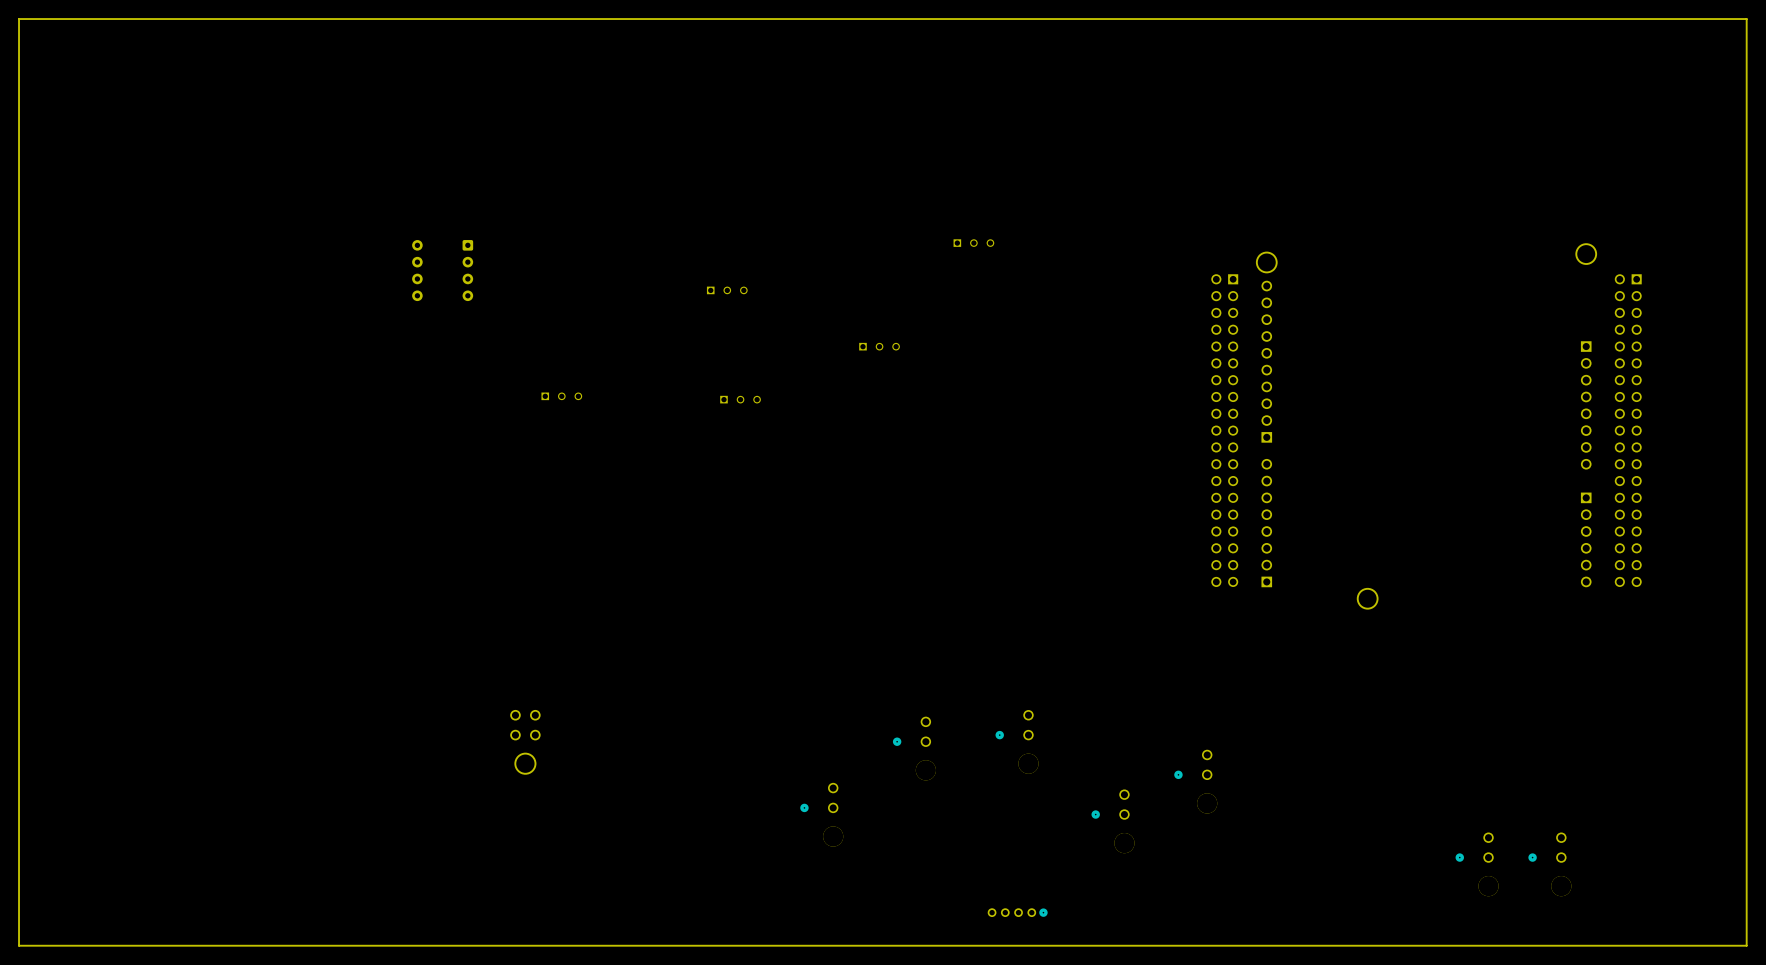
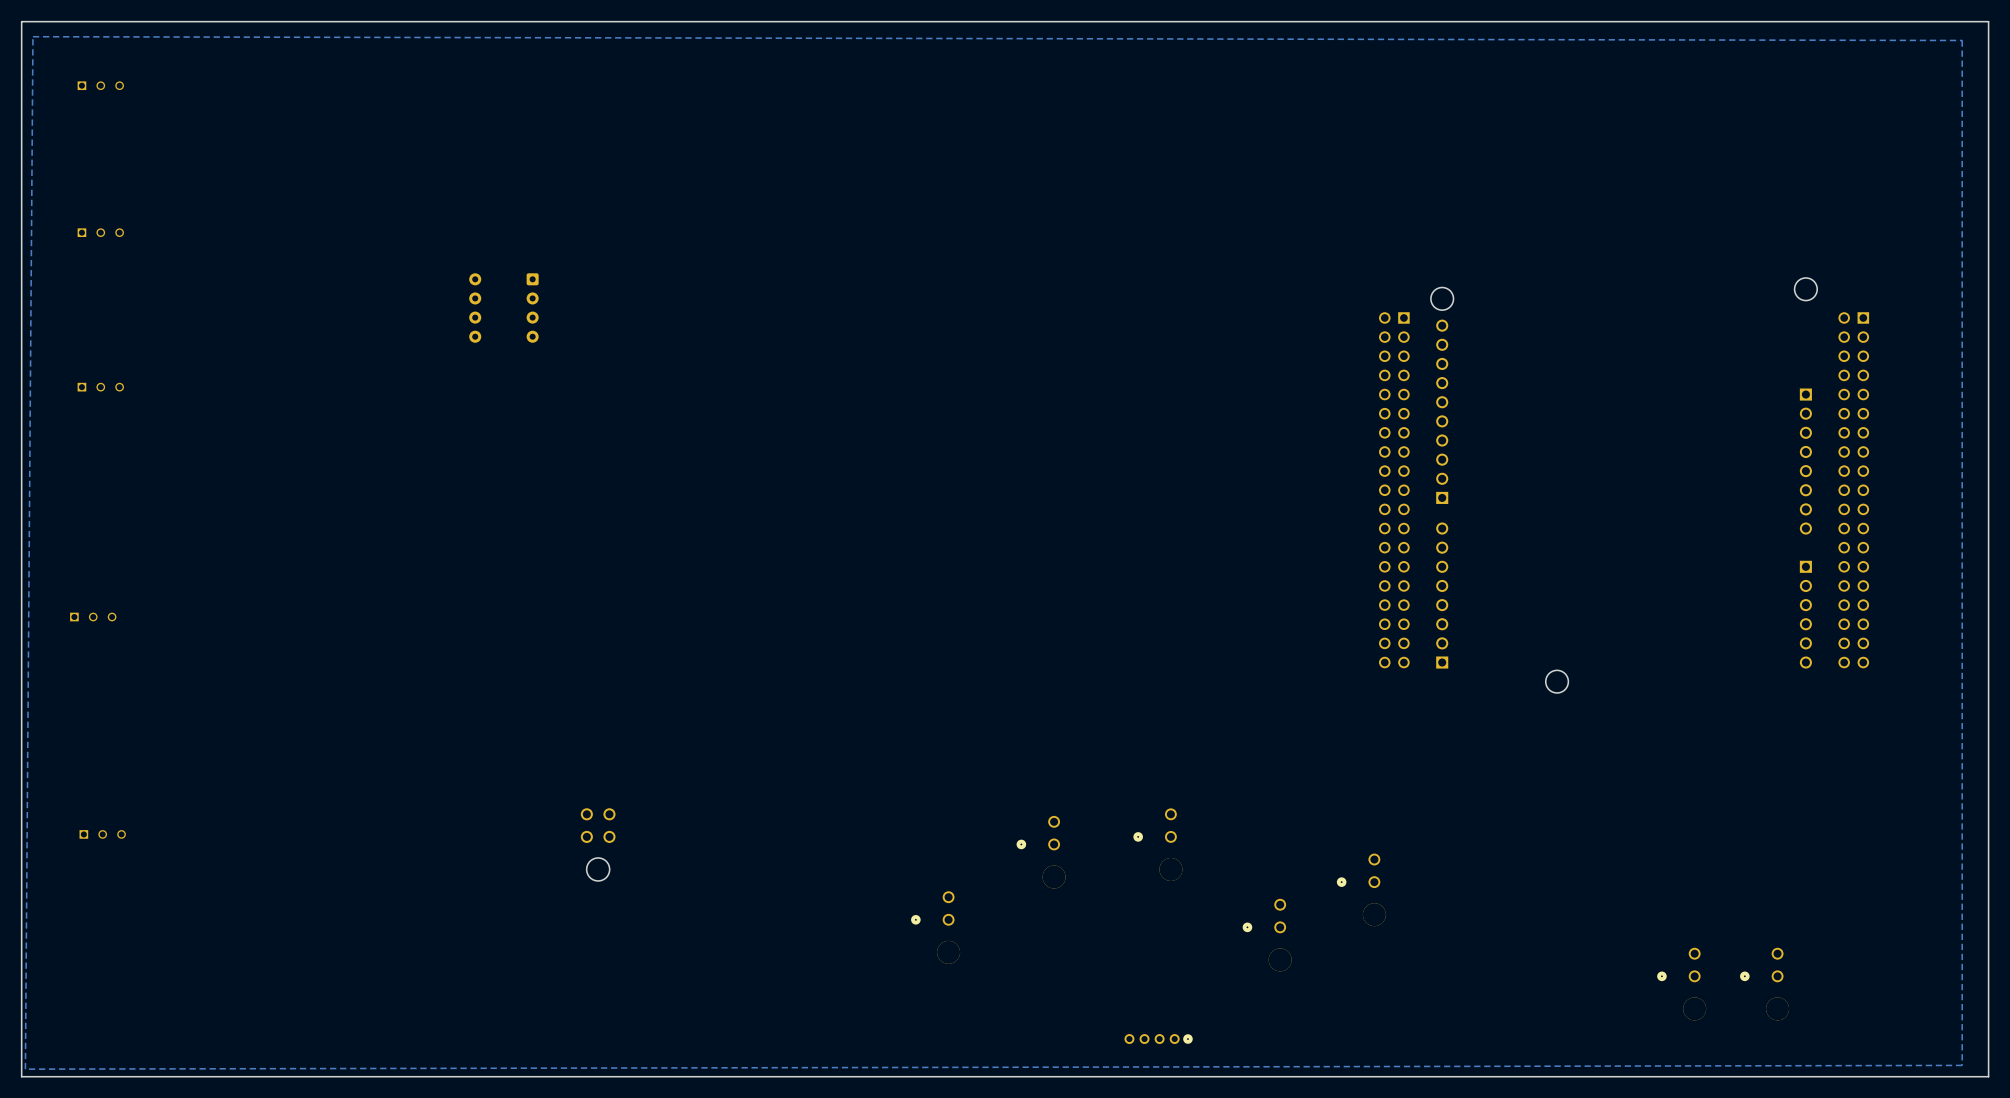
zone outline: none -> (32, 36) (25, 1069) (1962, 1065) (1962, 40) (32, 36)
part: none -> (100, 85)
part: none -> (100, 232)
part: (973, 243) -> none
part: (727, 290) -> none
part: none -> (100, 387)
part: (879, 346) -> none
part: (561, 396) -> none
part: (740, 399) -> none
part: none -> (93, 617)
part: none -> (102, 834)

